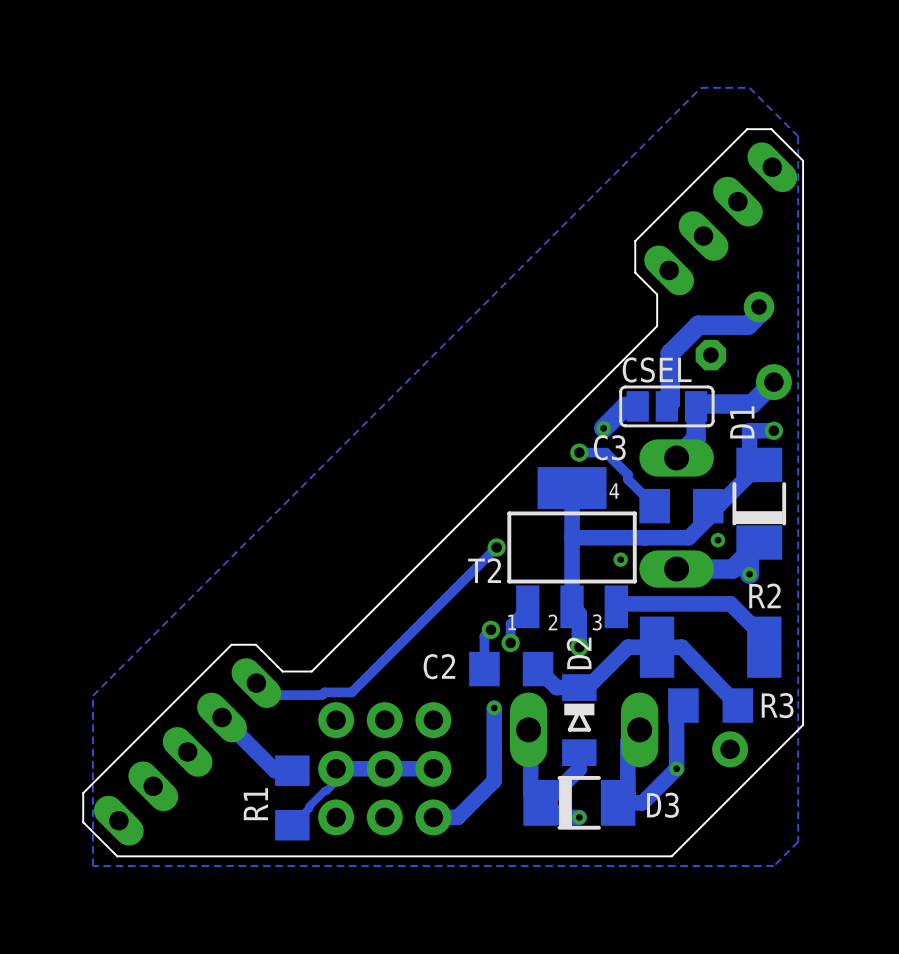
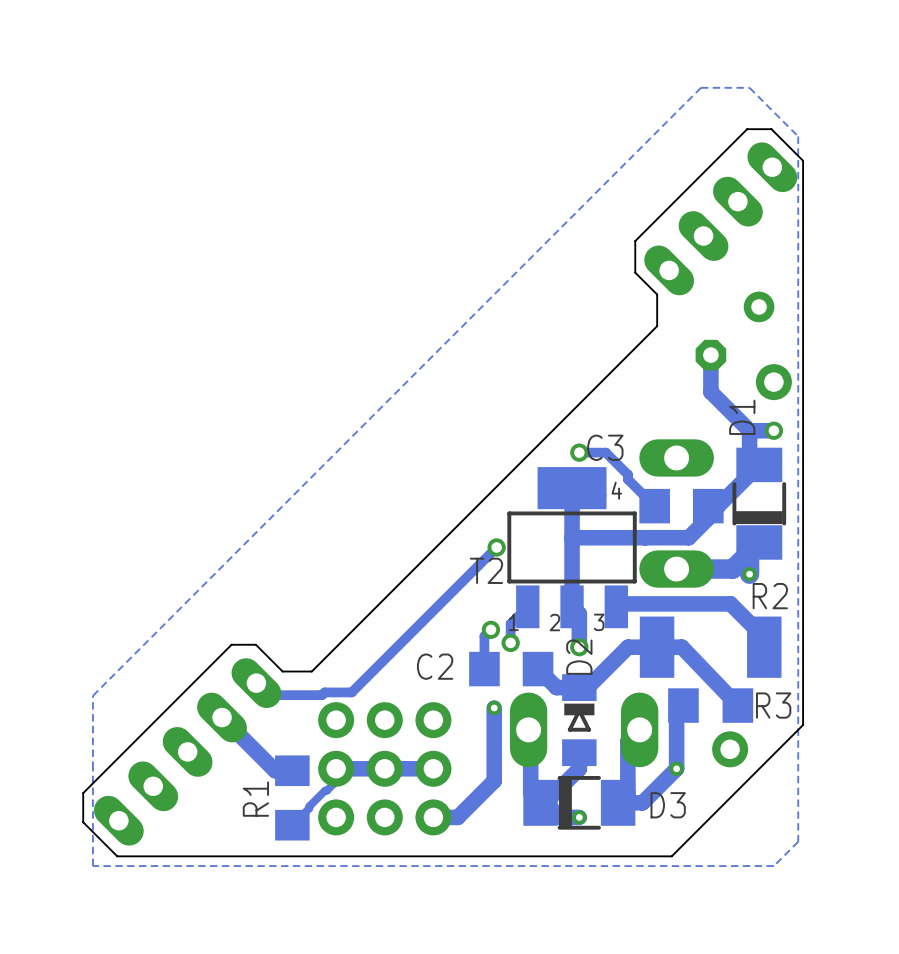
track: (759, 306) (759, 314) (748, 325) (698, 325) (670, 353) (670, 403) (666, 406) -> none
track: none -> (710, 355) (710, 392) (749, 430)
track: (773, 382) (752, 403) (698, 403) (696, 406) (696, 438) (676, 457) -> none
track: (637, 406) (625, 406) (603, 428) -> none
CSEL: (666, 406) -> none
via: (603, 428) -> none
via: (717, 540) -> none
via: (620, 559) -> none

